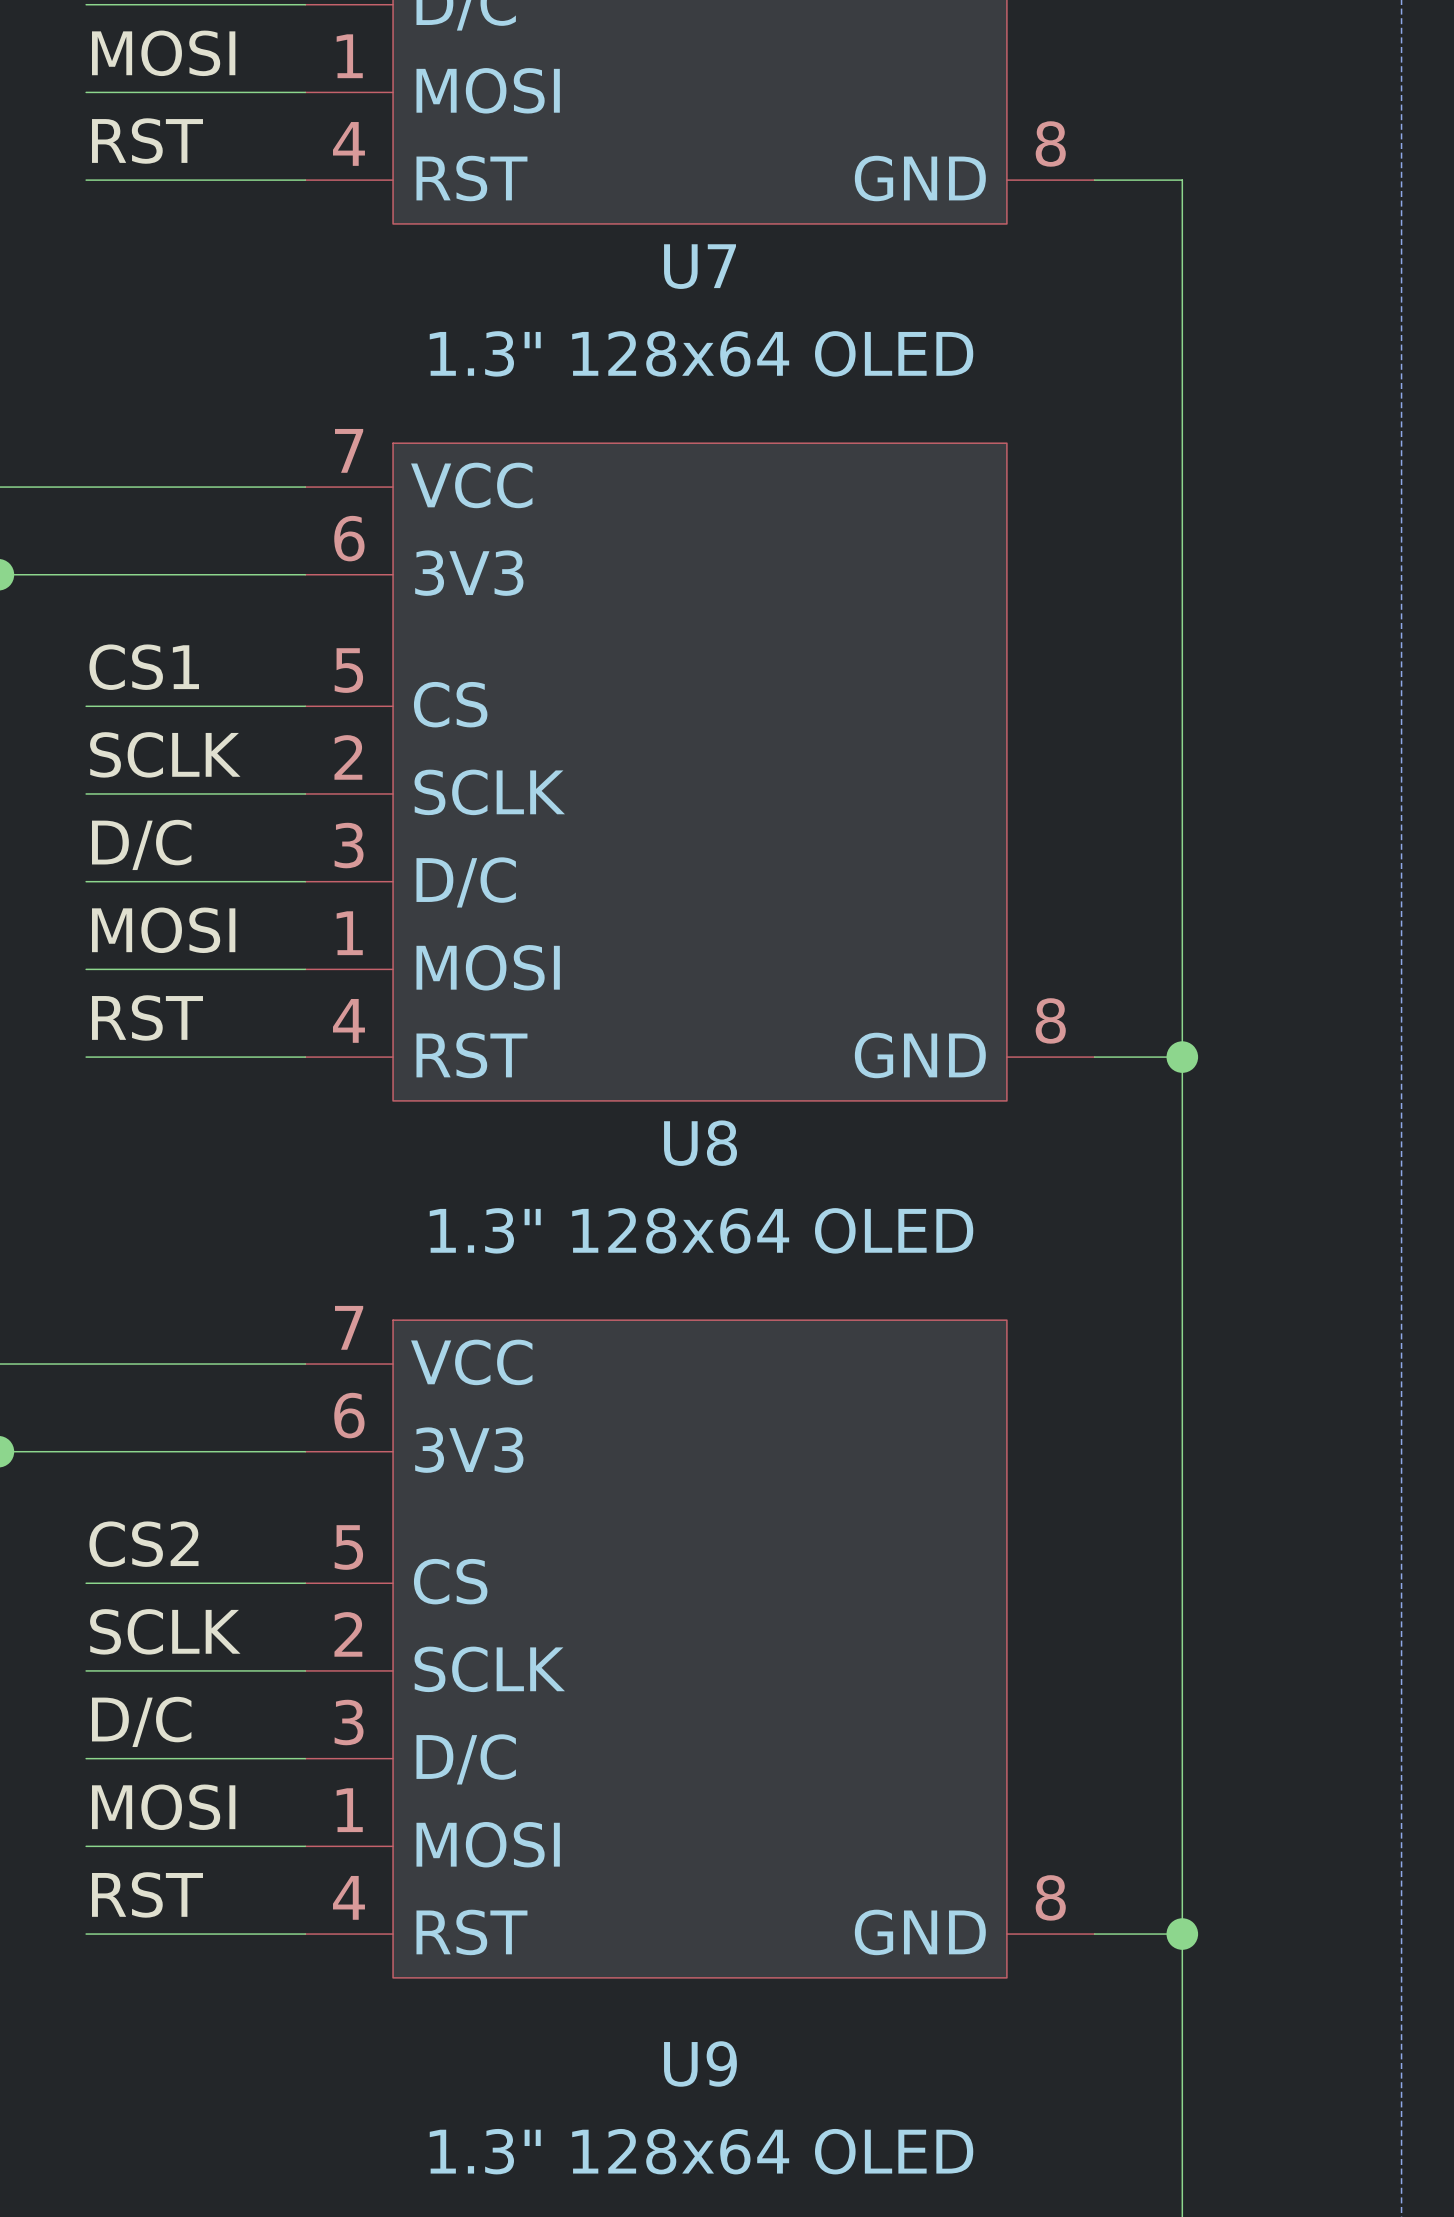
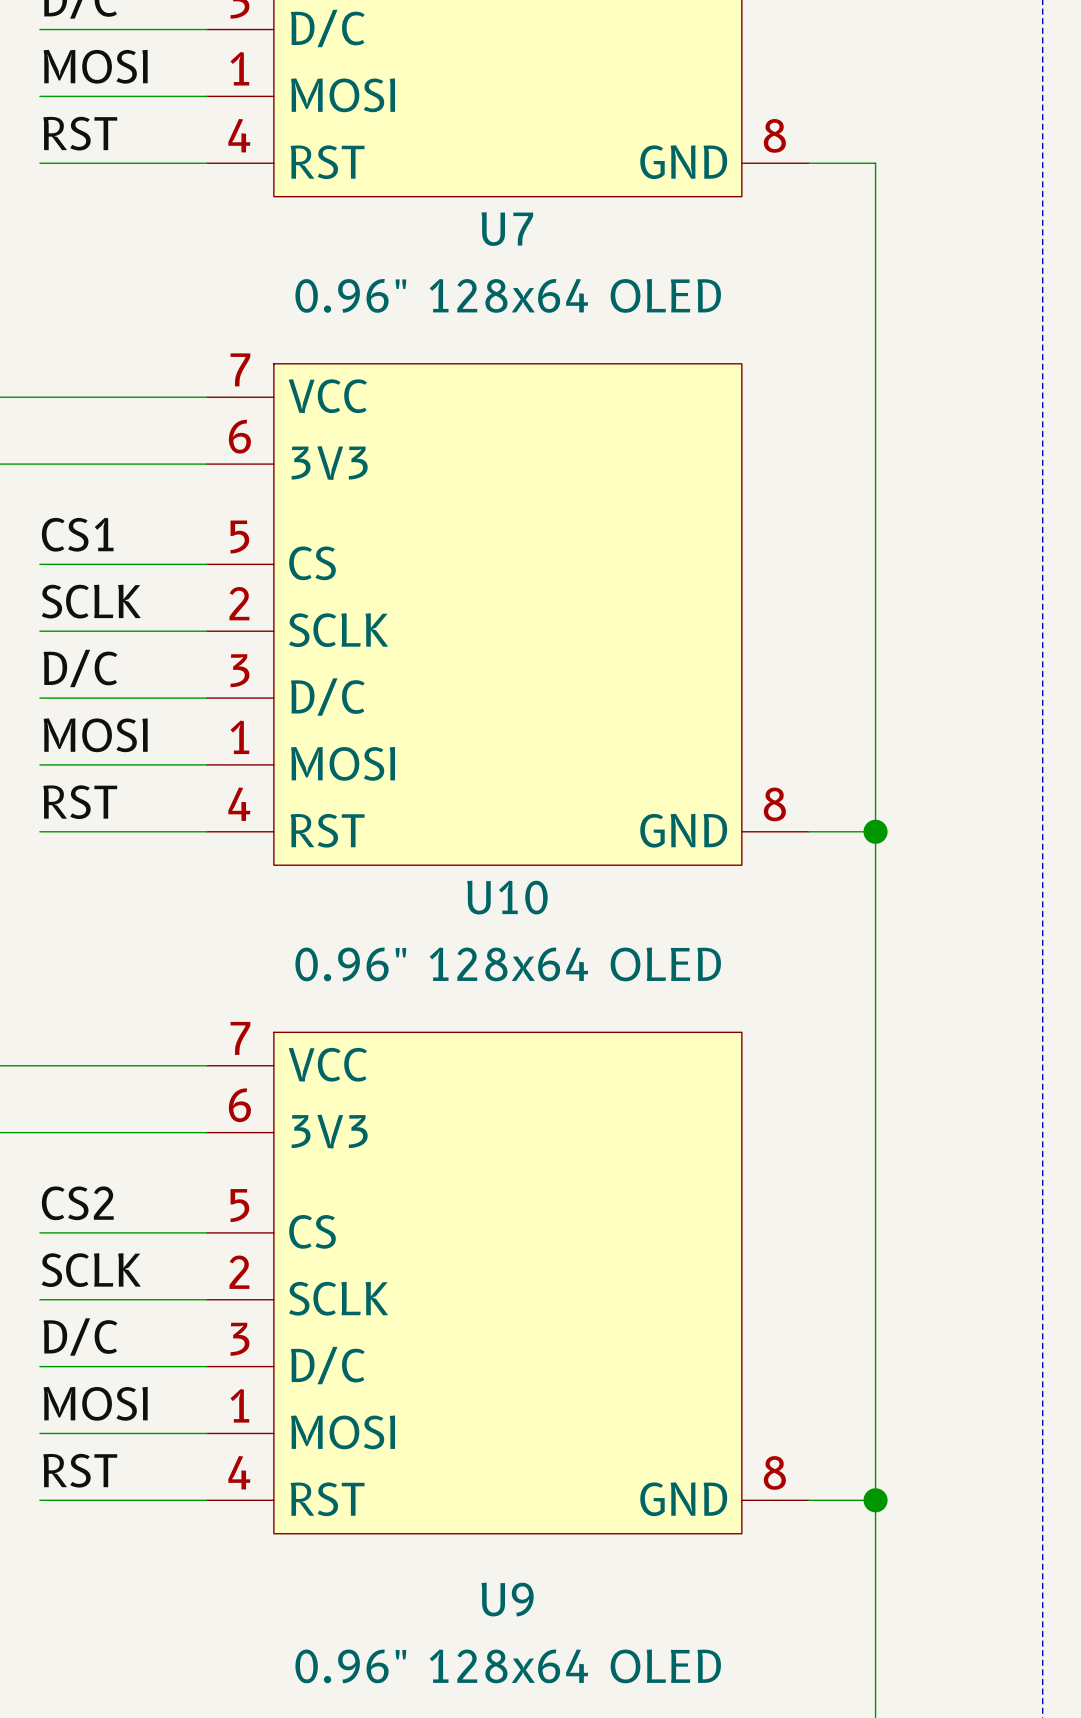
U7 value: 1.3" 128x64 OLED (701, 353) -> 0.96" 128x64 OLED (508, 295)
U8 name: U8 (700, 1143) -> U10 (507, 897)
U8 value: 1.3" 128x64 OLED (701, 1230) -> 0.96" 128x64 OLED (508, 964)
U9 value: 1.3" 128x64 OLED (701, 2151) -> 0.96" 128x64 OLED (508, 1666)

